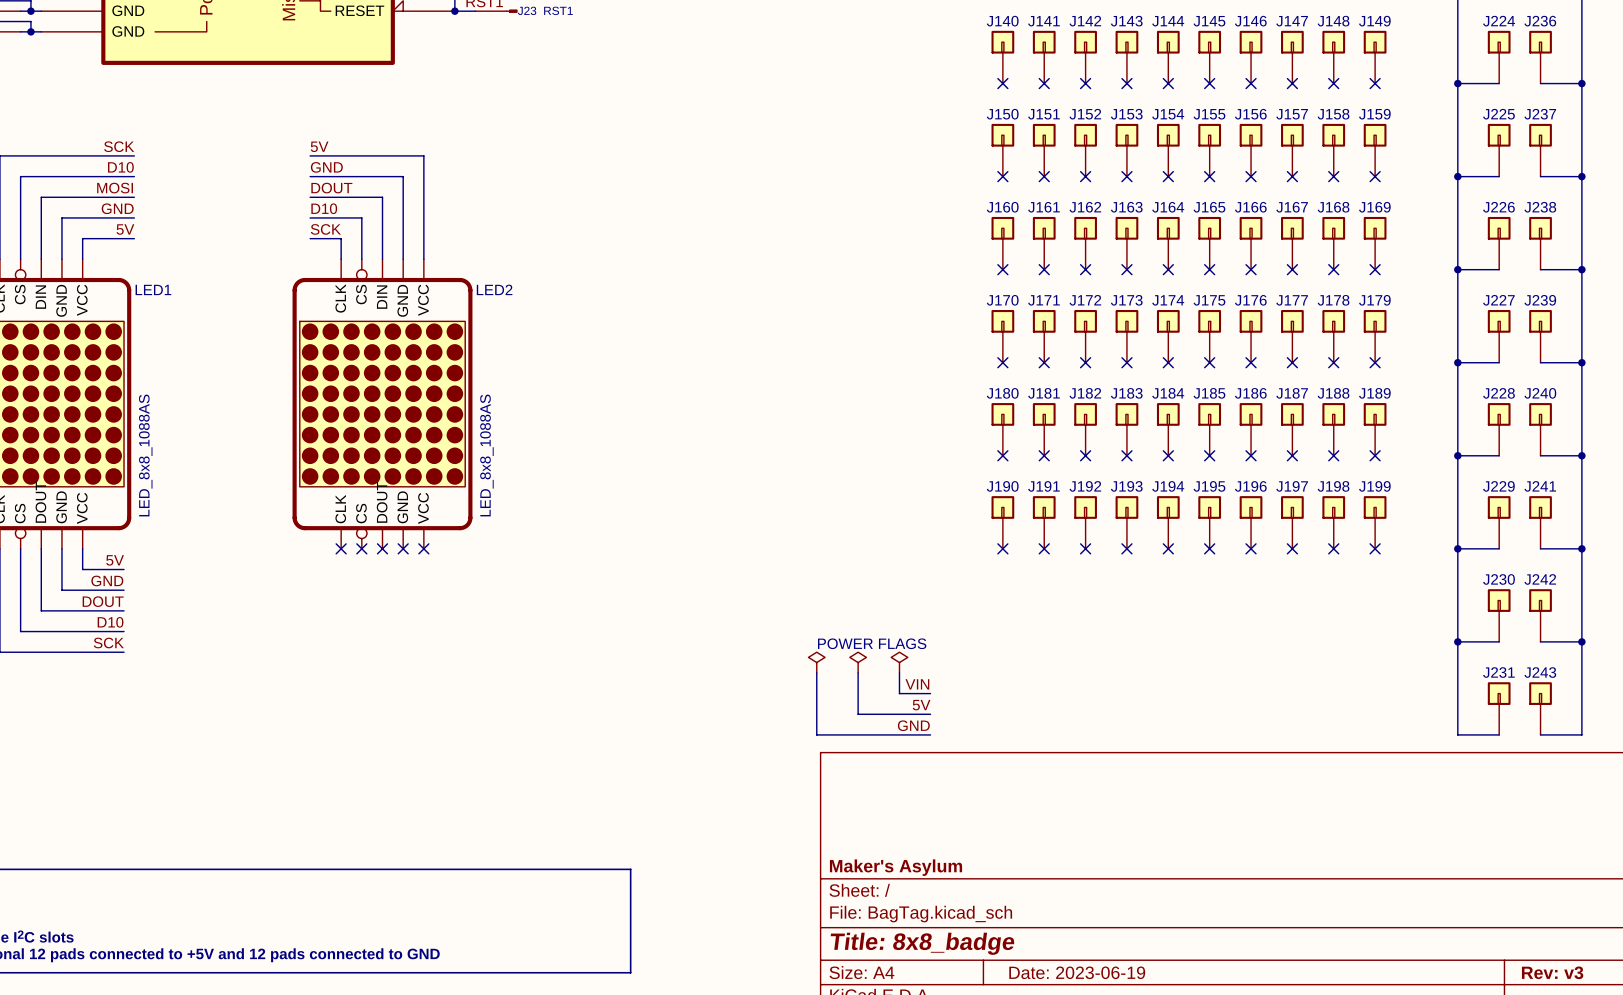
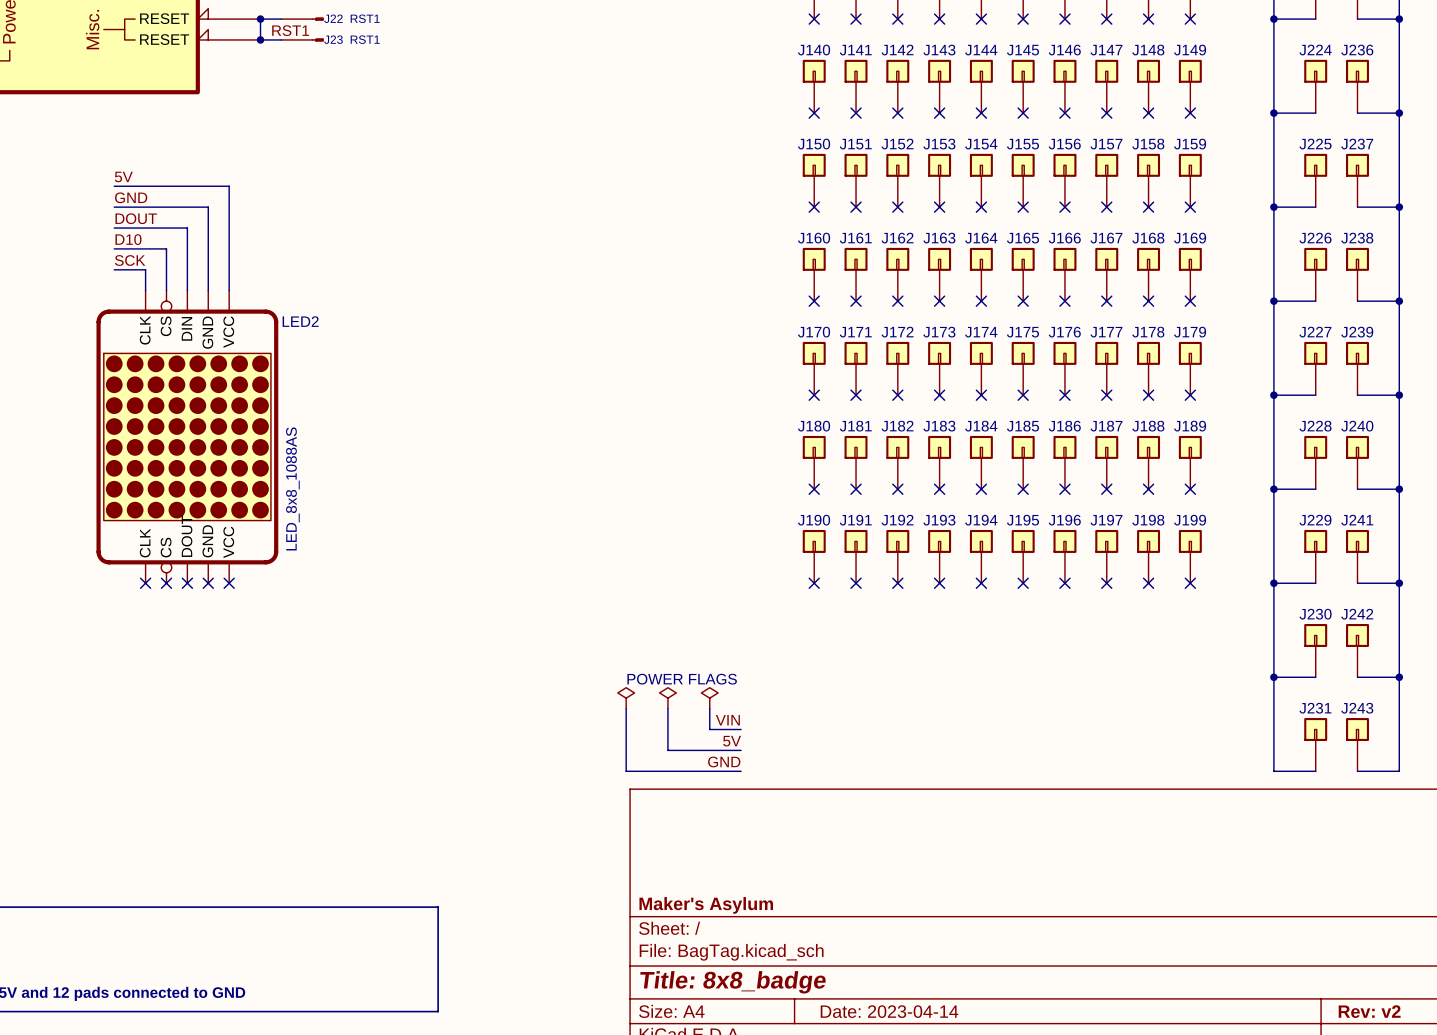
title block: Date: 2023-06-19 (1077, 972) -> Date: 2023-04-14 (889, 1011)
title block: Rev: v3 (1552, 972) -> Rev: v2 (1369, 1011)

